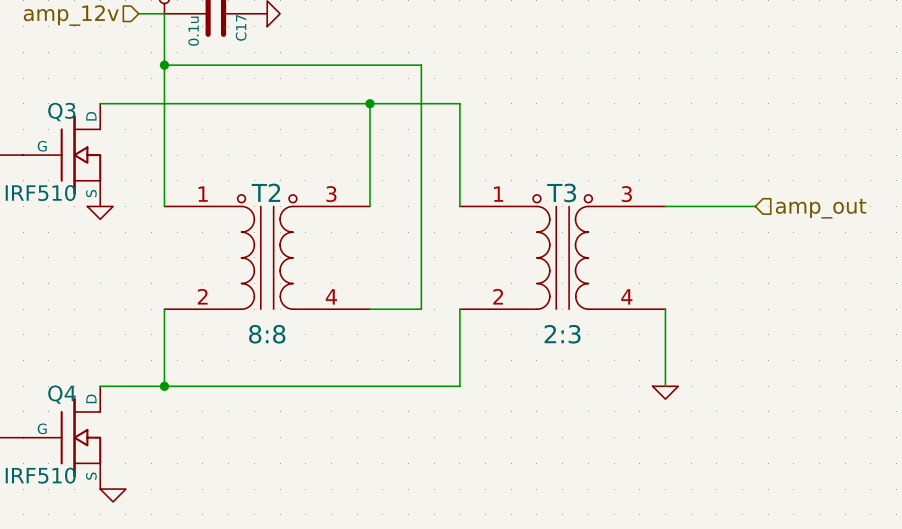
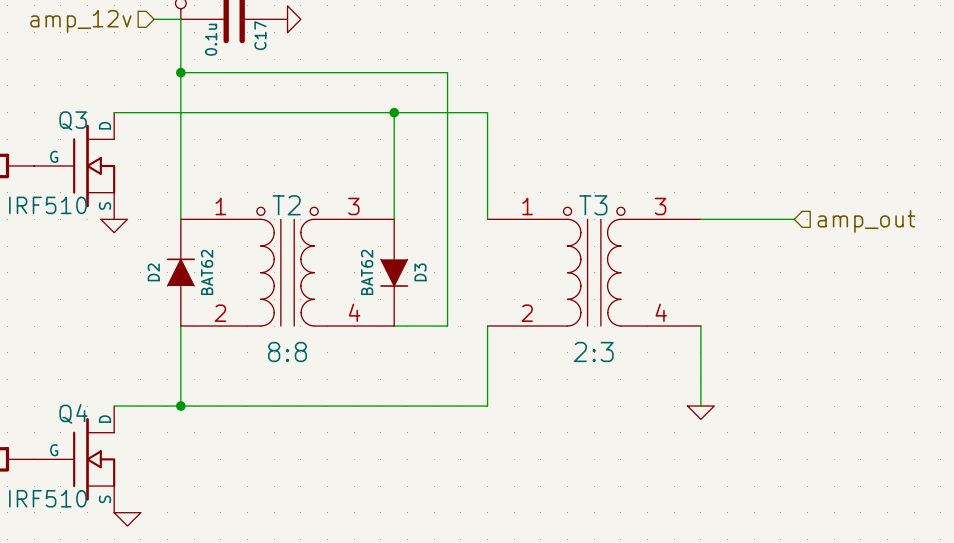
D2: none -> BAT62 (180, 272)
D3: none -> BAT62 (394, 272)

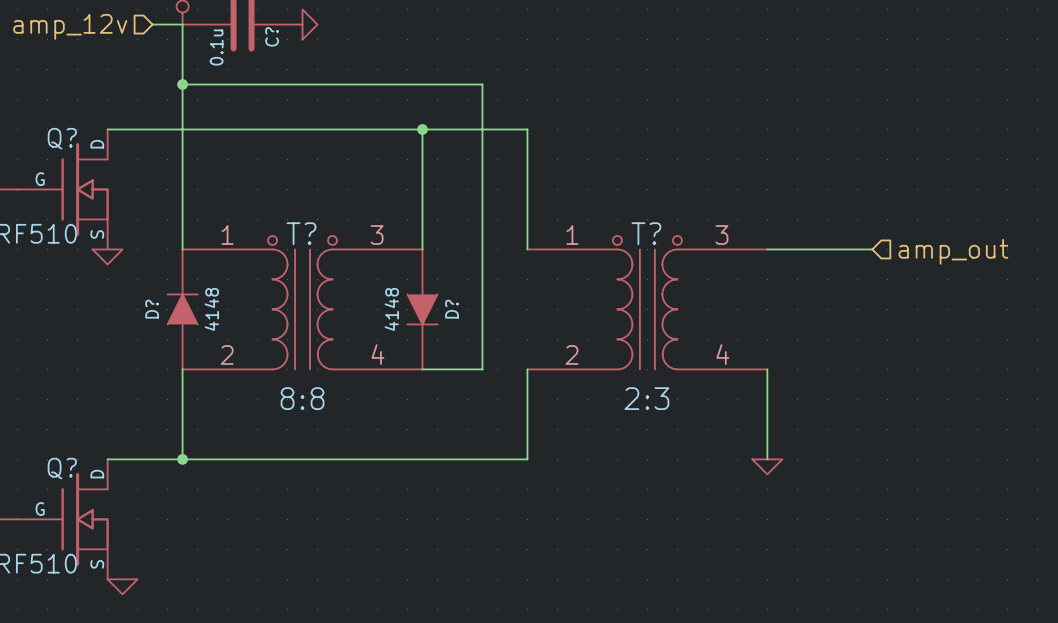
C17 name: C17 (260, 35) -> C? (272, 36)
Q3 name: Q3 (73, 120) -> Q? (62, 138)
T2 name: T2 (286, 205) -> T? (301, 233)
T3 name: T3 (593, 205) -> T? (646, 233)
D2 name: D2 (153, 272) -> D? (152, 309)
D2 value: BAT62 (207, 272) -> 4148 (211, 309)
D3 value: BAT62 (367, 272) -> 4148 (391, 309)
D3 name: D3 (420, 272) -> D? (452, 309)
Q4 name: Q4 (73, 413) -> Q? (62, 468)

